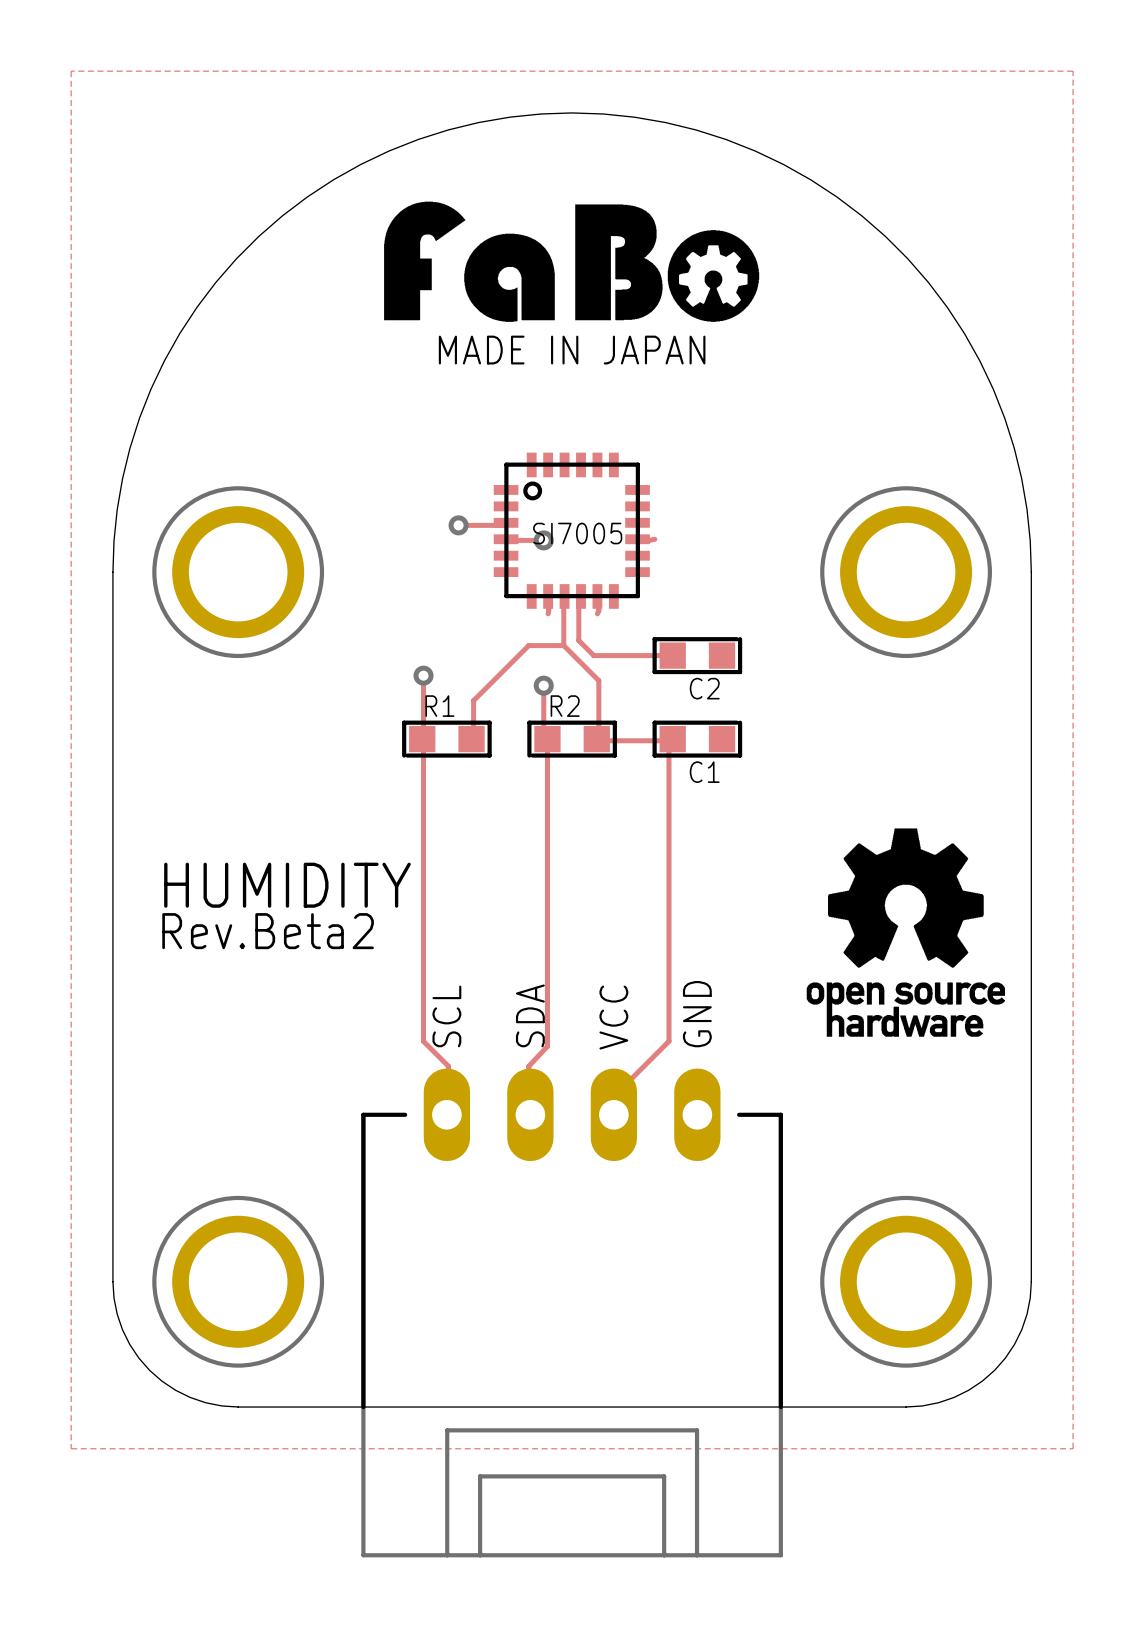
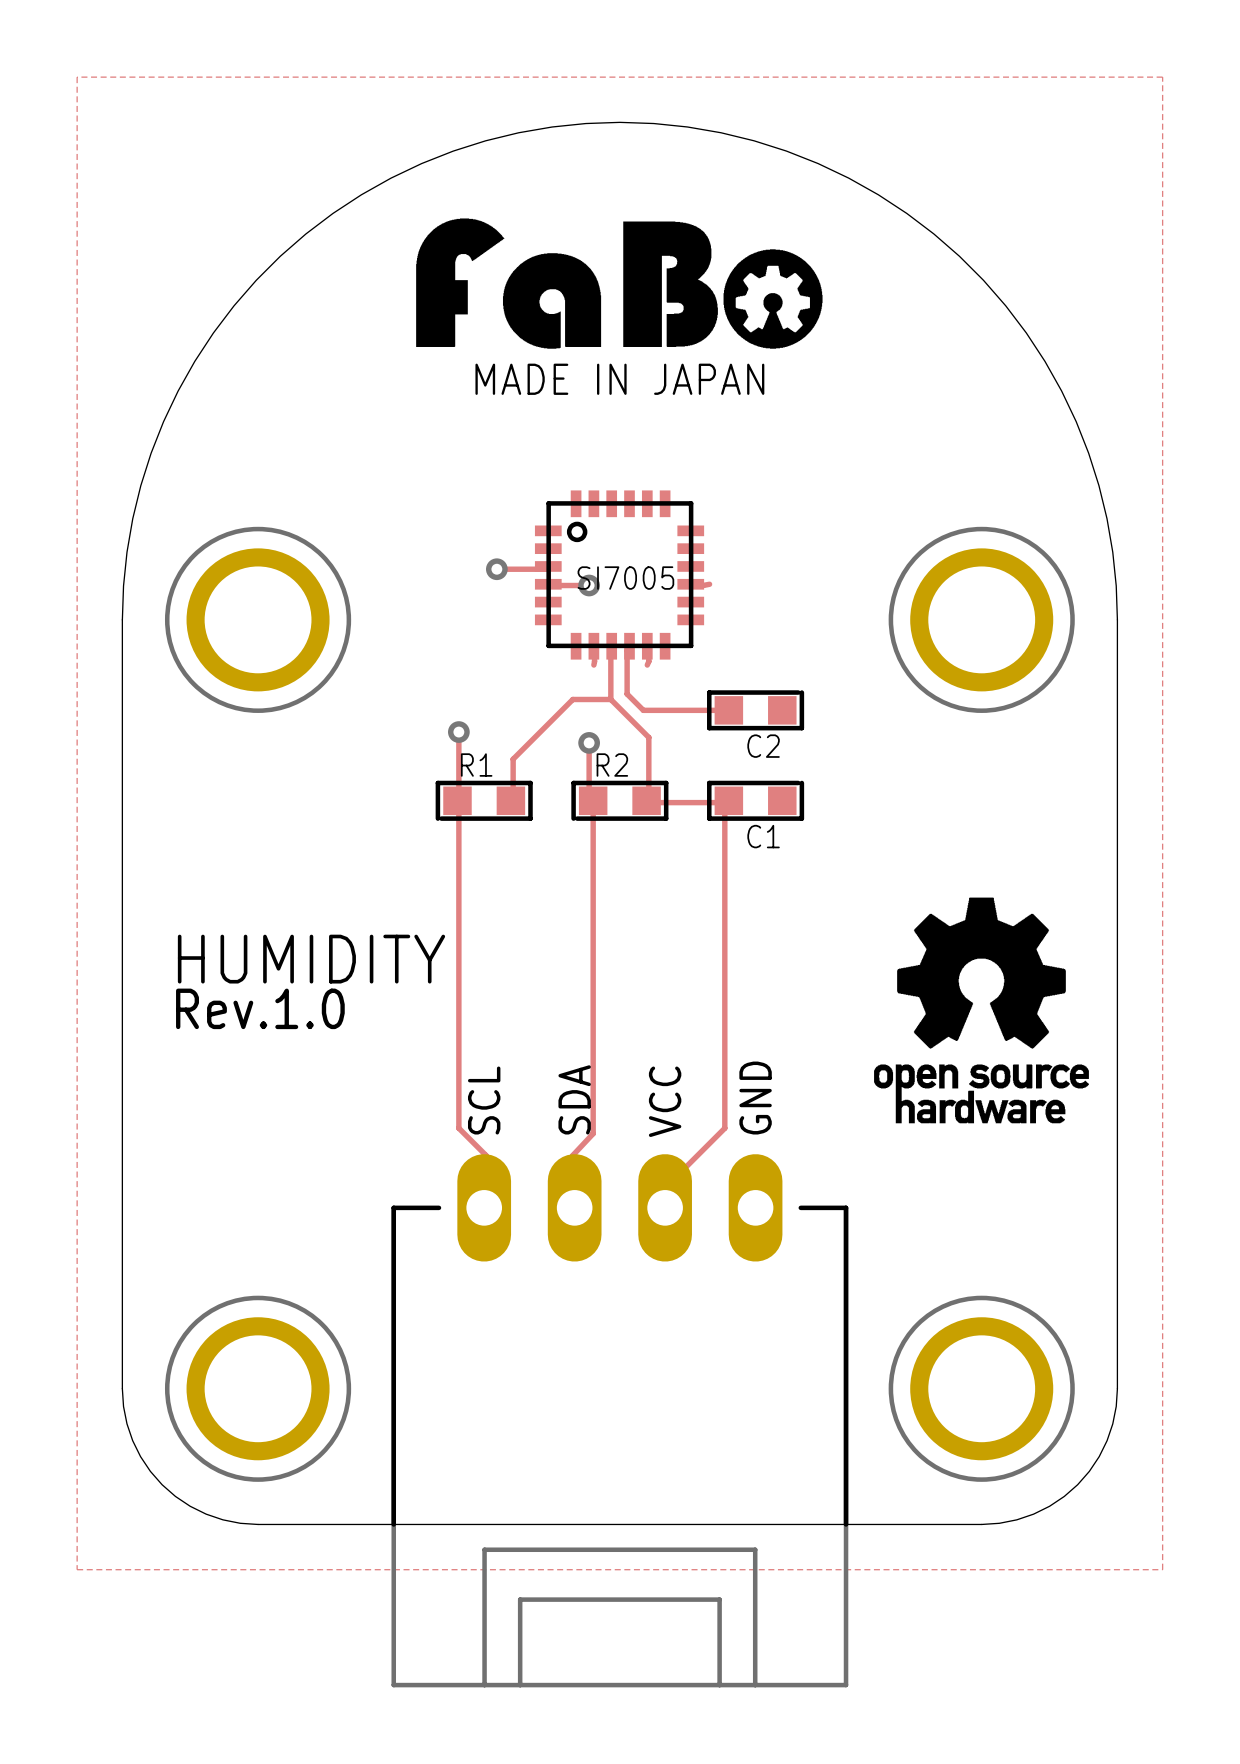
part footprint: [112, 112, 1032, 1558] -> [122, 122, 1118, 1688]
text: Rev.Beta2 (268, 931) -> Rev.1.0 (260, 1008)

